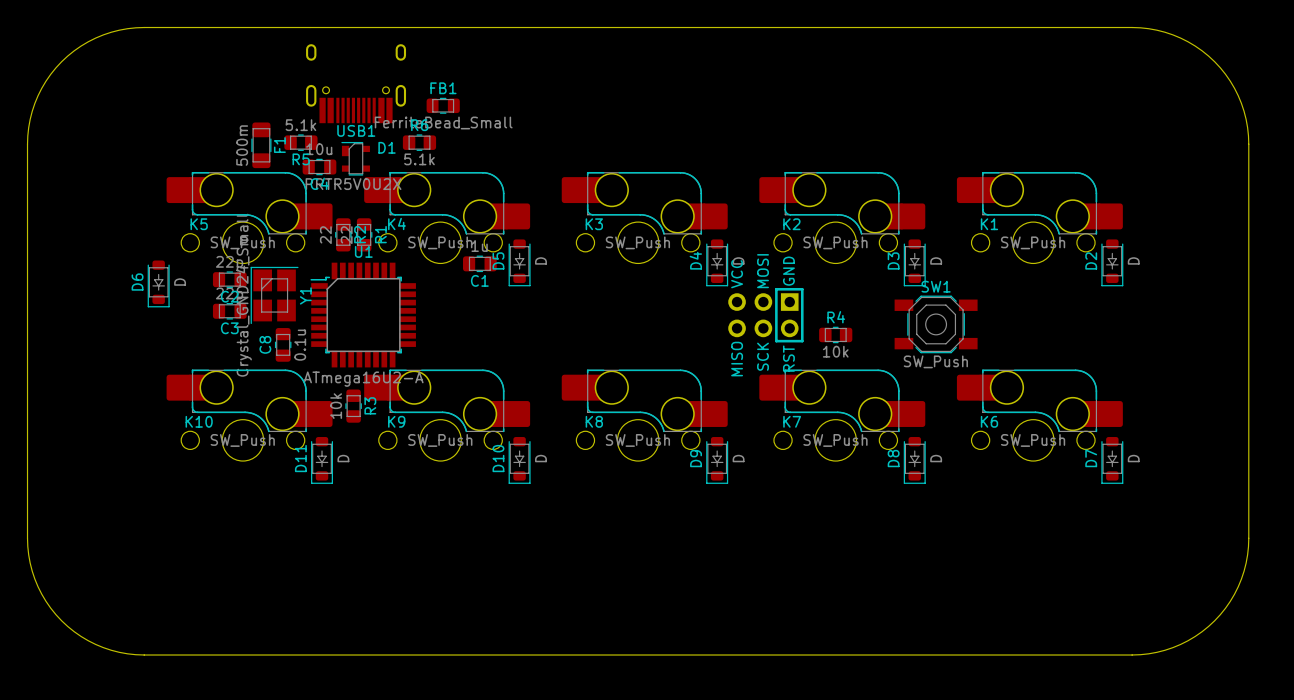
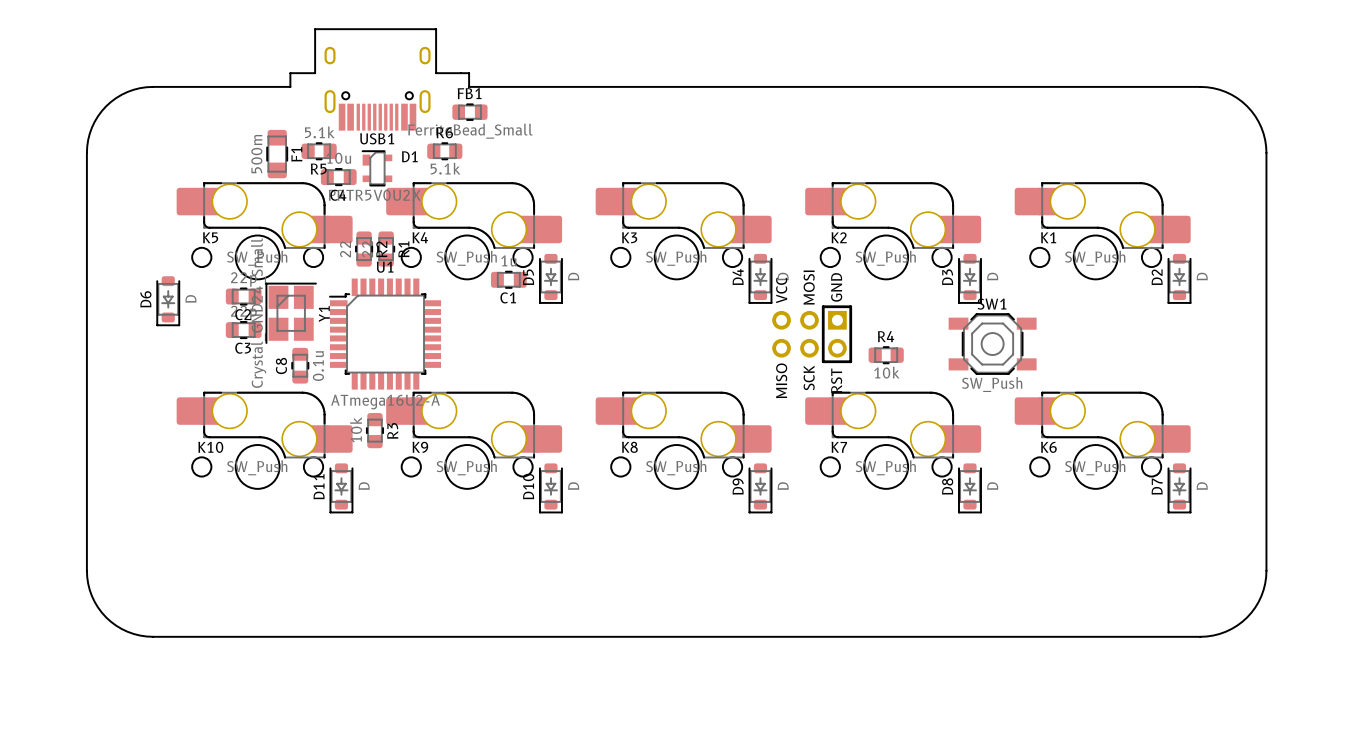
board edge: (297, 27) (144, 27) (111, 32) (88, 41) (61, 61) (46, 81) (34, 103) (28, 127) (27, 144) (27, 546) (32, 571) (41, 594) (61, 620) (81, 636) (111, 650) (144, 655) (1132, 655) (1156, 652) (1188, 640) (1208, 626) (1225, 608) (1241, 579) (1248, 546) (1248, 135) (1244, 111) (1234, 88) (1220, 67) (1202, 50) (1172, 34) (1148, 28) (1132, 27) (411, 27) -> (315, 29) (315, 73) (290, 73) (290, 86) (140, 88) (127, 91) (111, 101) (98, 116) (89, 133) (86, 152) (87, 577) (94, 601) (101, 612) (116, 625) (133, 633) (152, 636) (1200, 636) (1213, 635) (1231, 629) (1242, 621) (1255, 607) (1263, 589) (1266, 570) (1266, 152) (1265, 140) (1258, 121) (1251, 111) (1237, 98) (1219, 89) (1200, 86) (469, 86) (469, 73) (436, 73) (436, 29)

